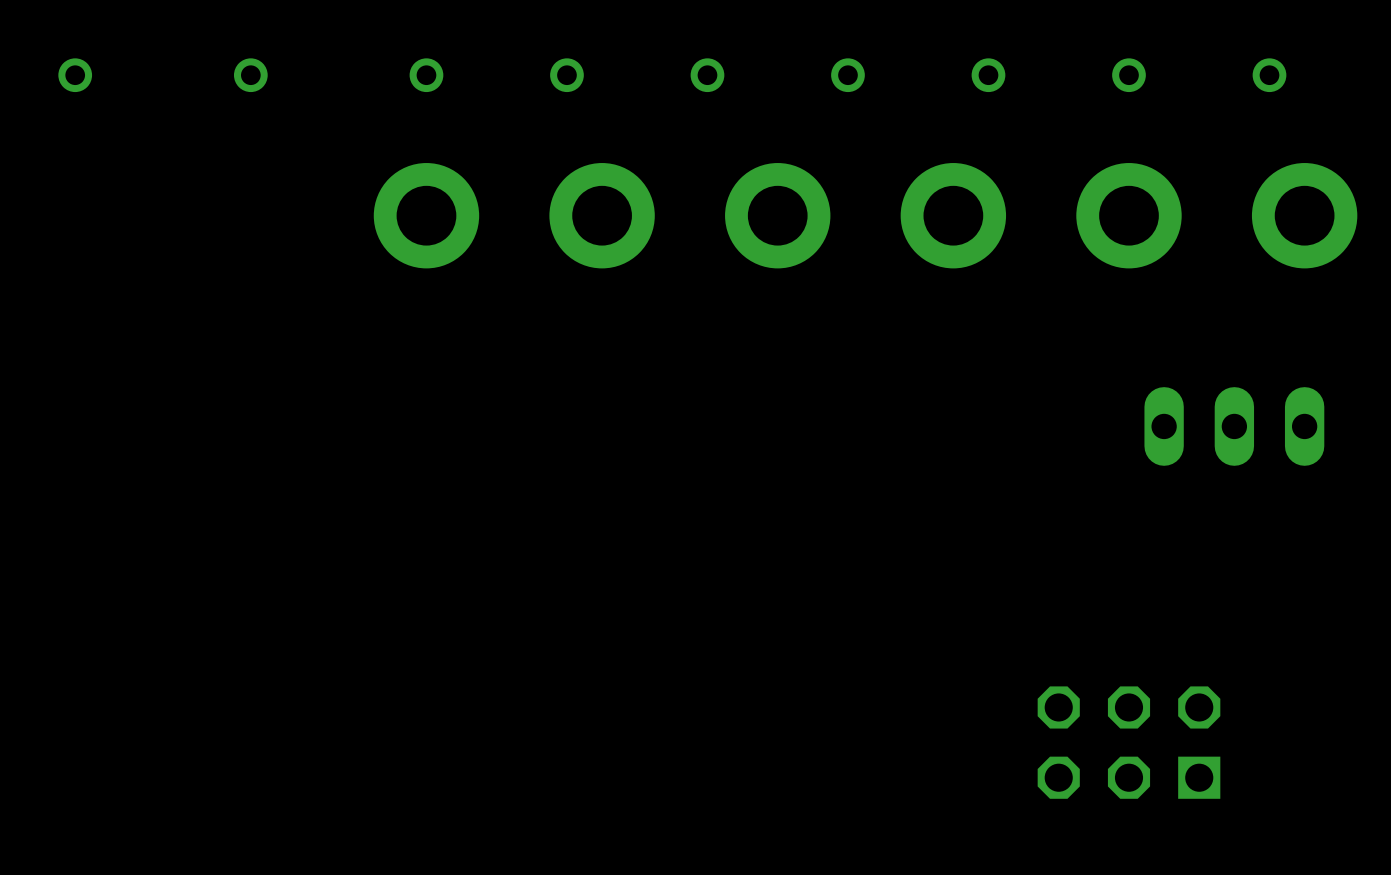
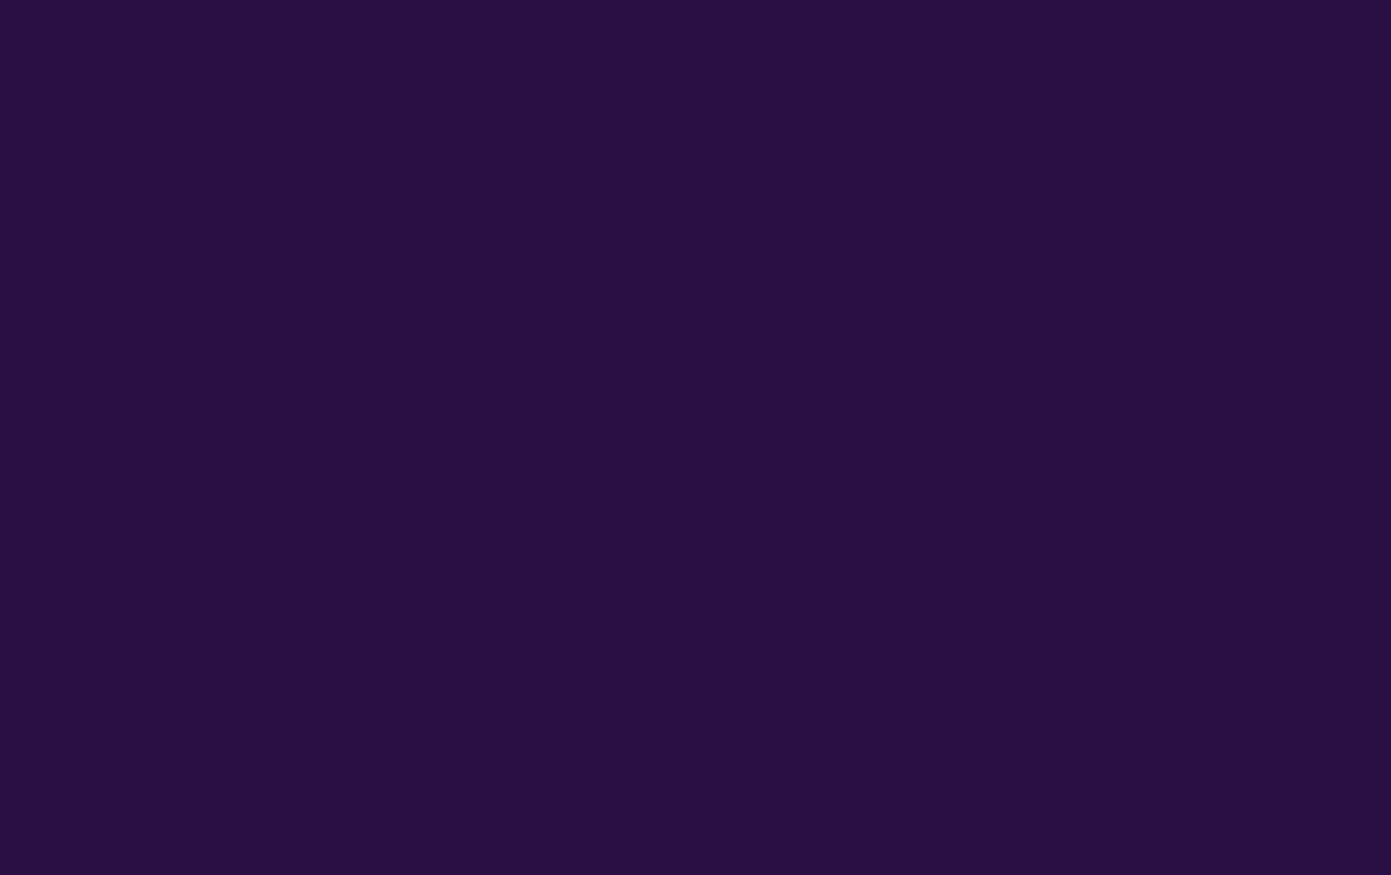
part: (75, 75) -> none
part: (250, 75) -> none
part: (426, 75) -> none
part: (566, 75) -> none
part: (707, 75) -> none
part: (847, 75) -> none
part: (988, 75) -> none
part: (1128, 75) -> none
part: (1269, 75) -> none
part: (426, 215) -> none
part: (602, 215) -> none
part: (777, 215) -> none
part: (953, 215) -> none
part: (1128, 215) -> none
part: (1304, 215) -> none
part: (1234, 426) -> none
part: (1128, 742) -> none

